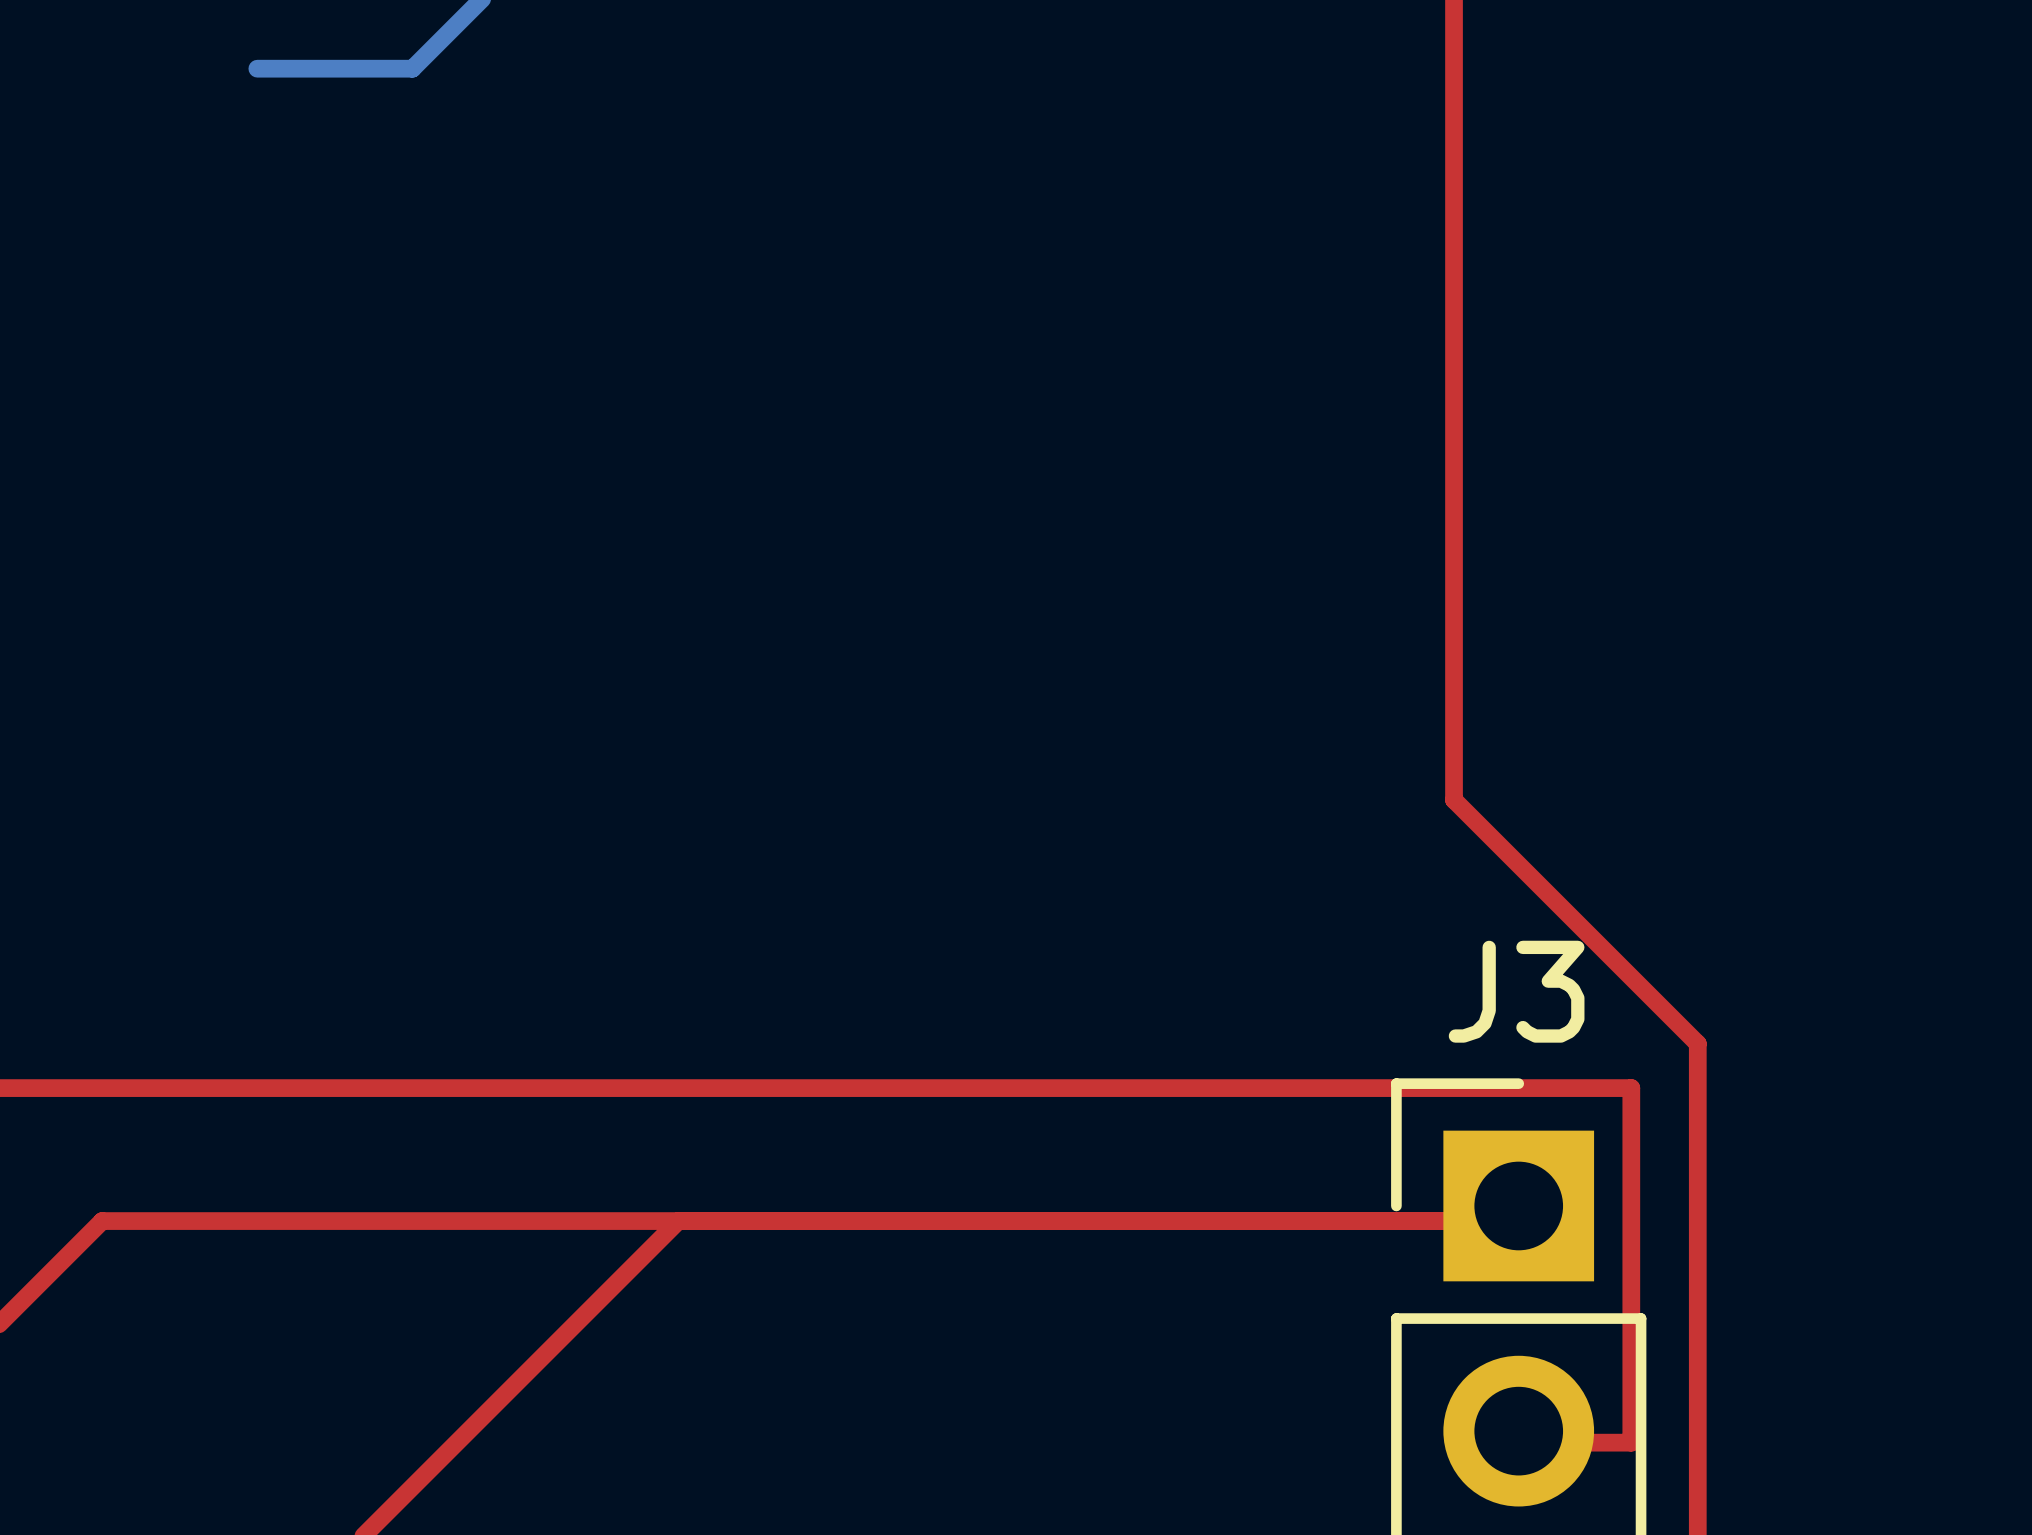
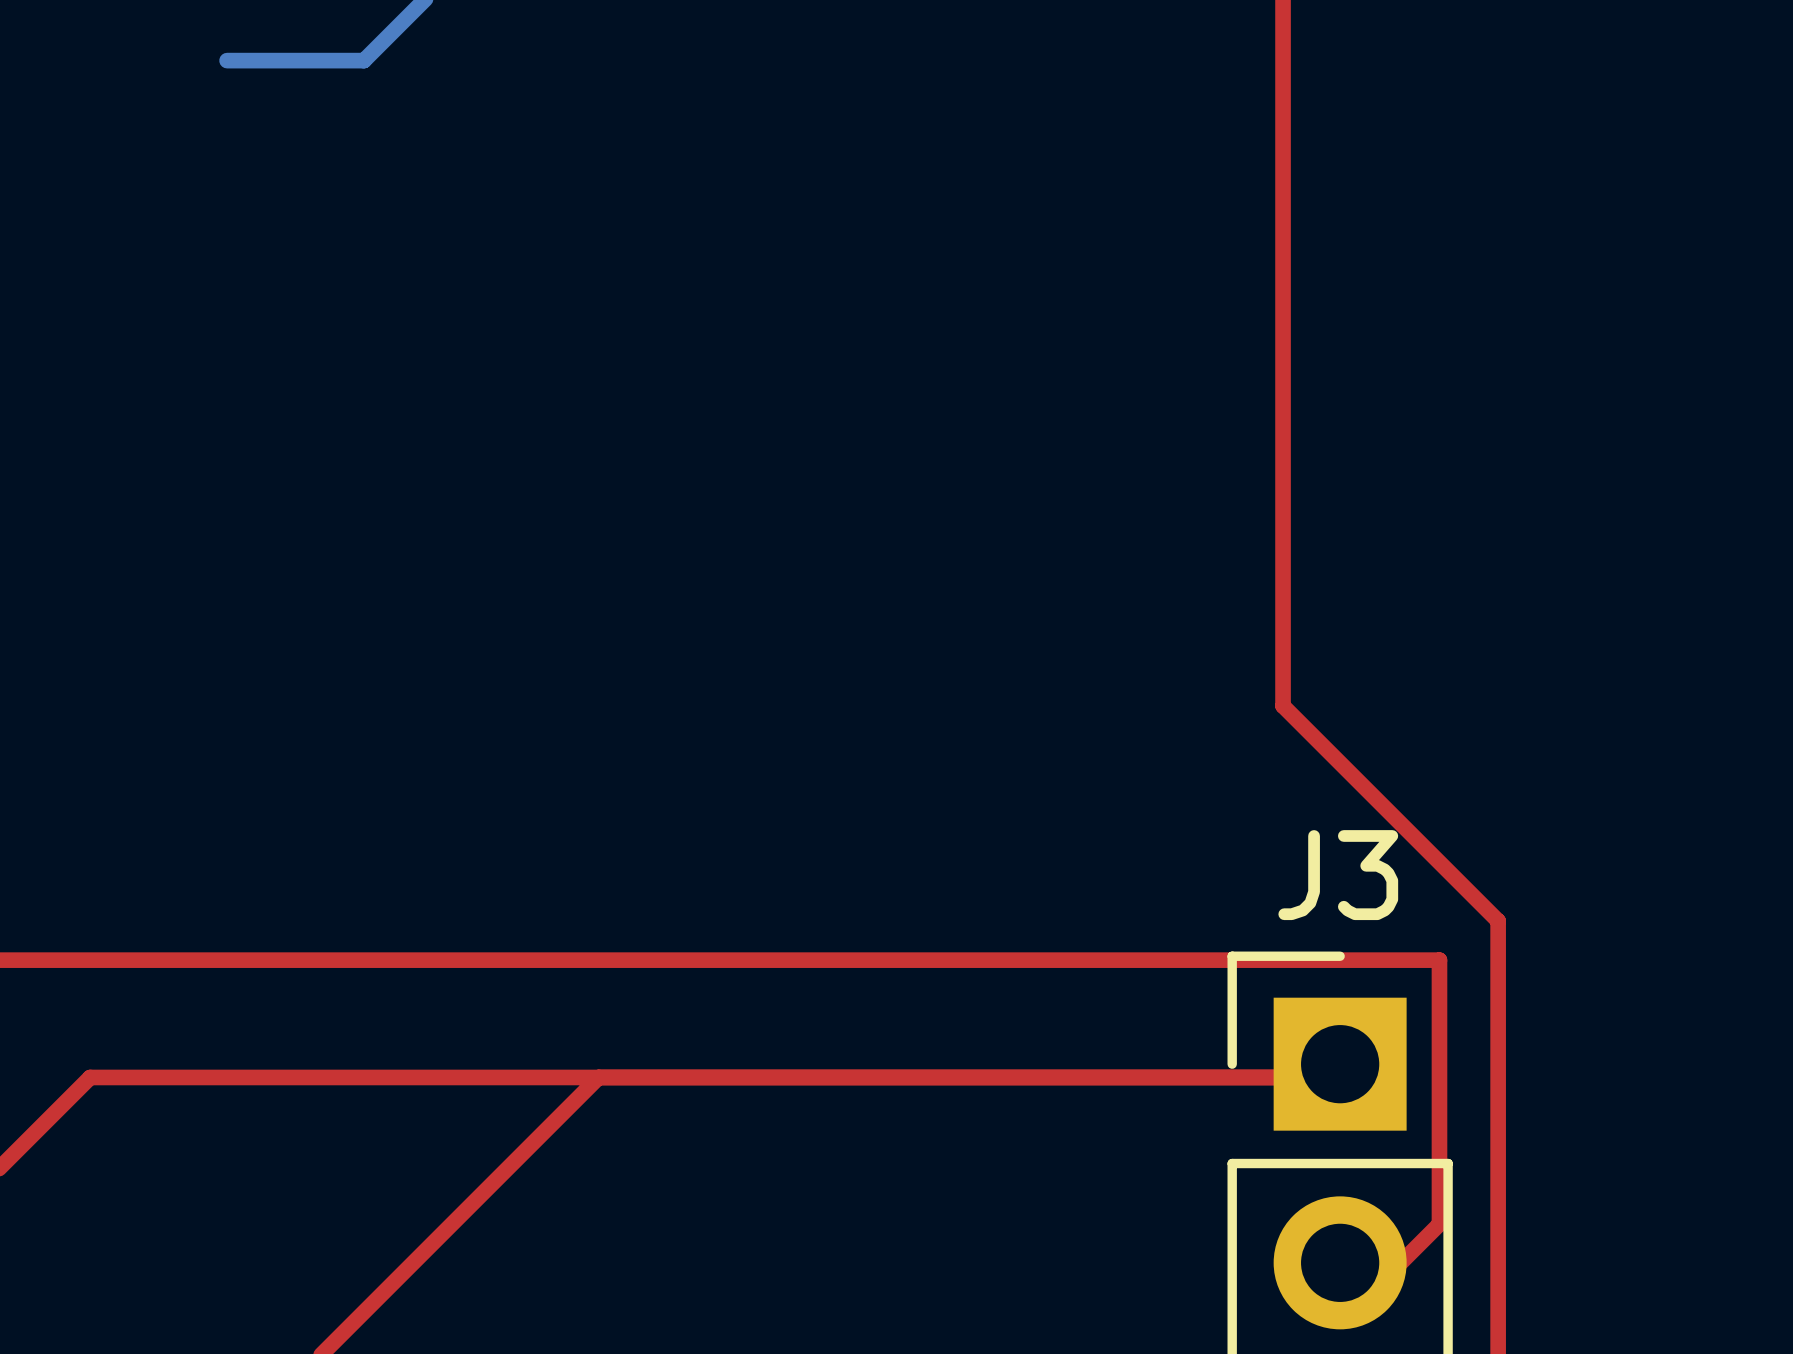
top track: (1631, 1387) (1631, 1442) (1575, 1442) -> (1439, 1224) (1390, 1273)

